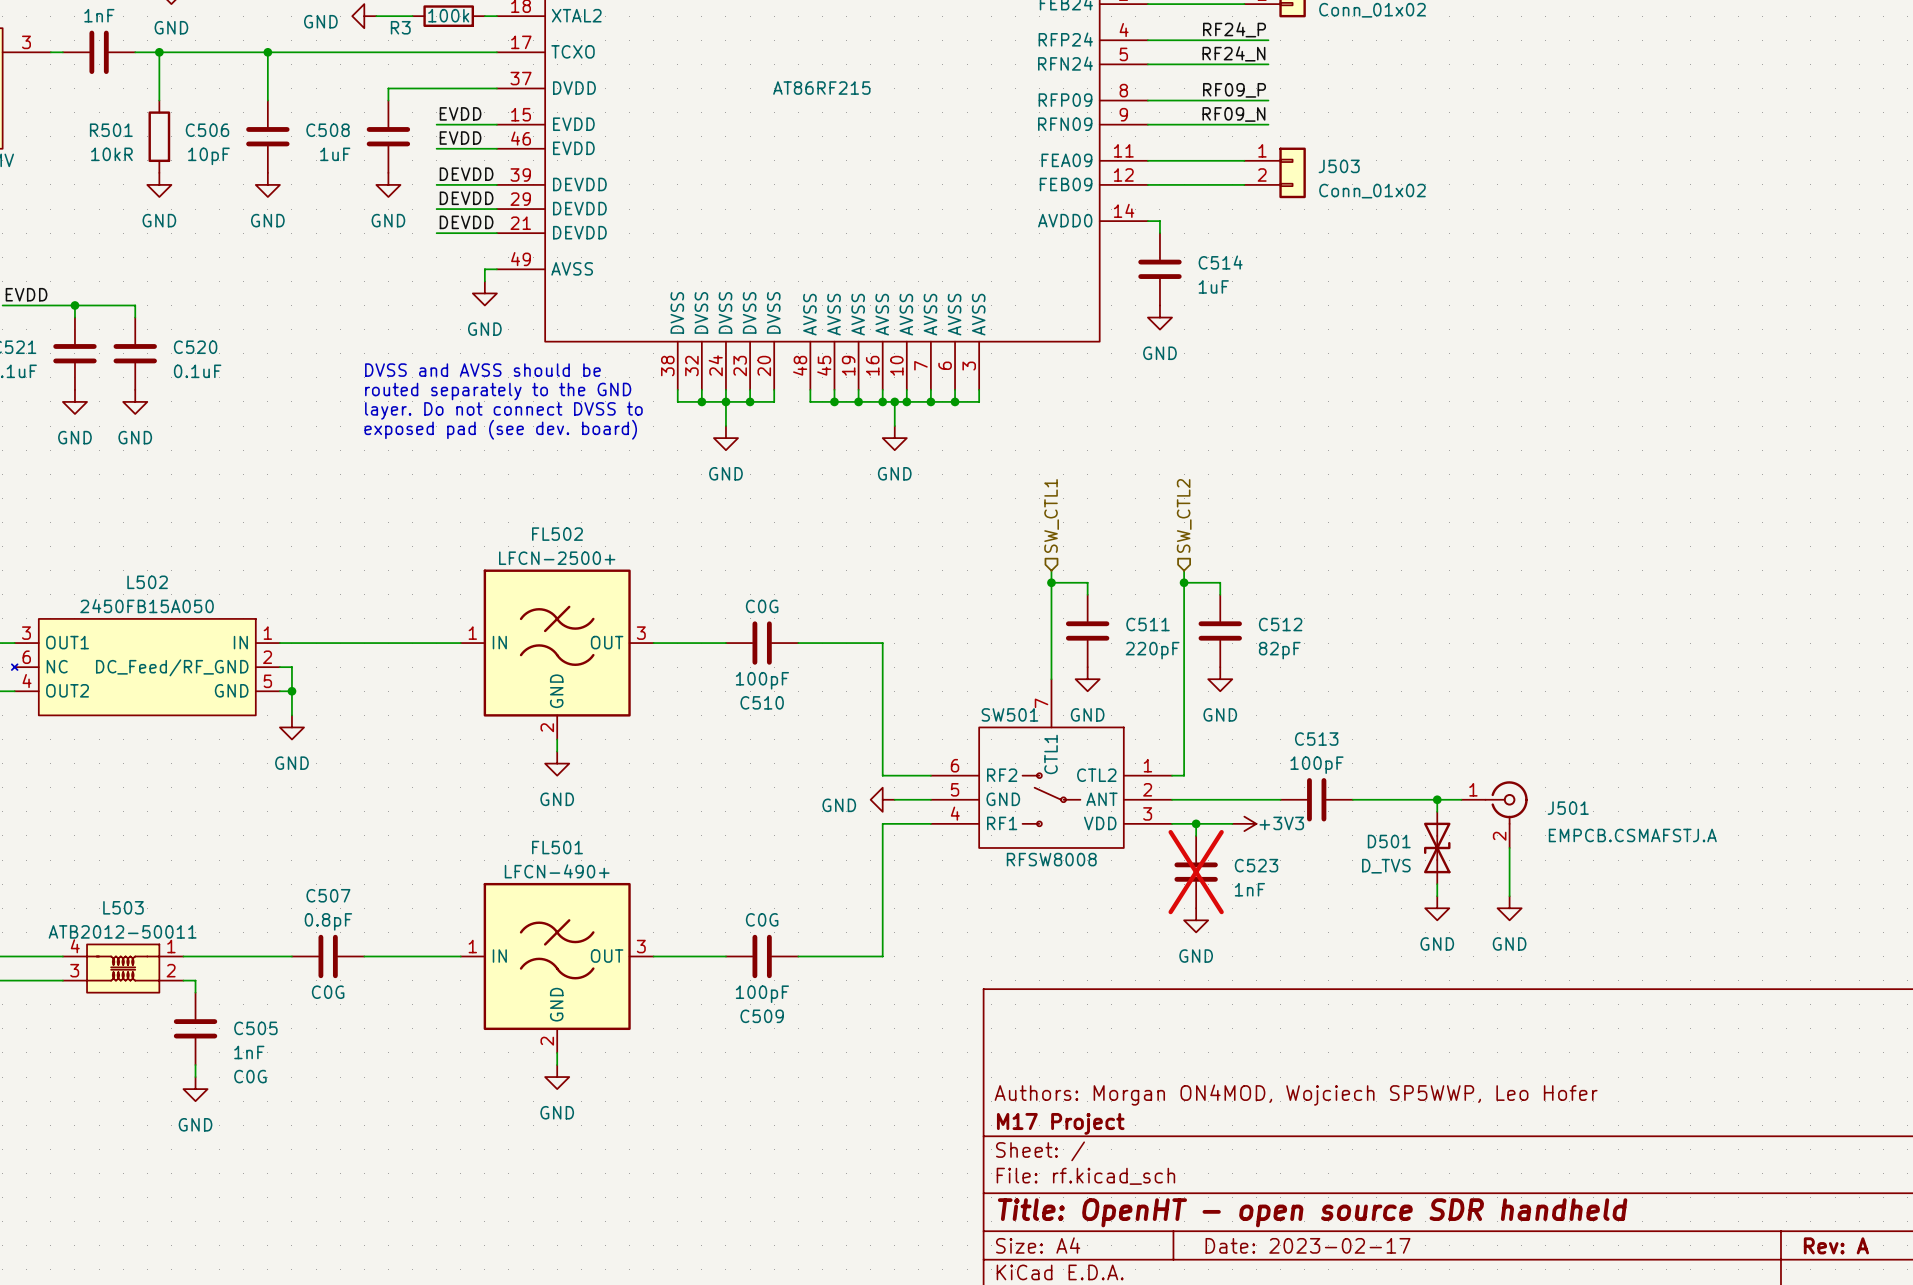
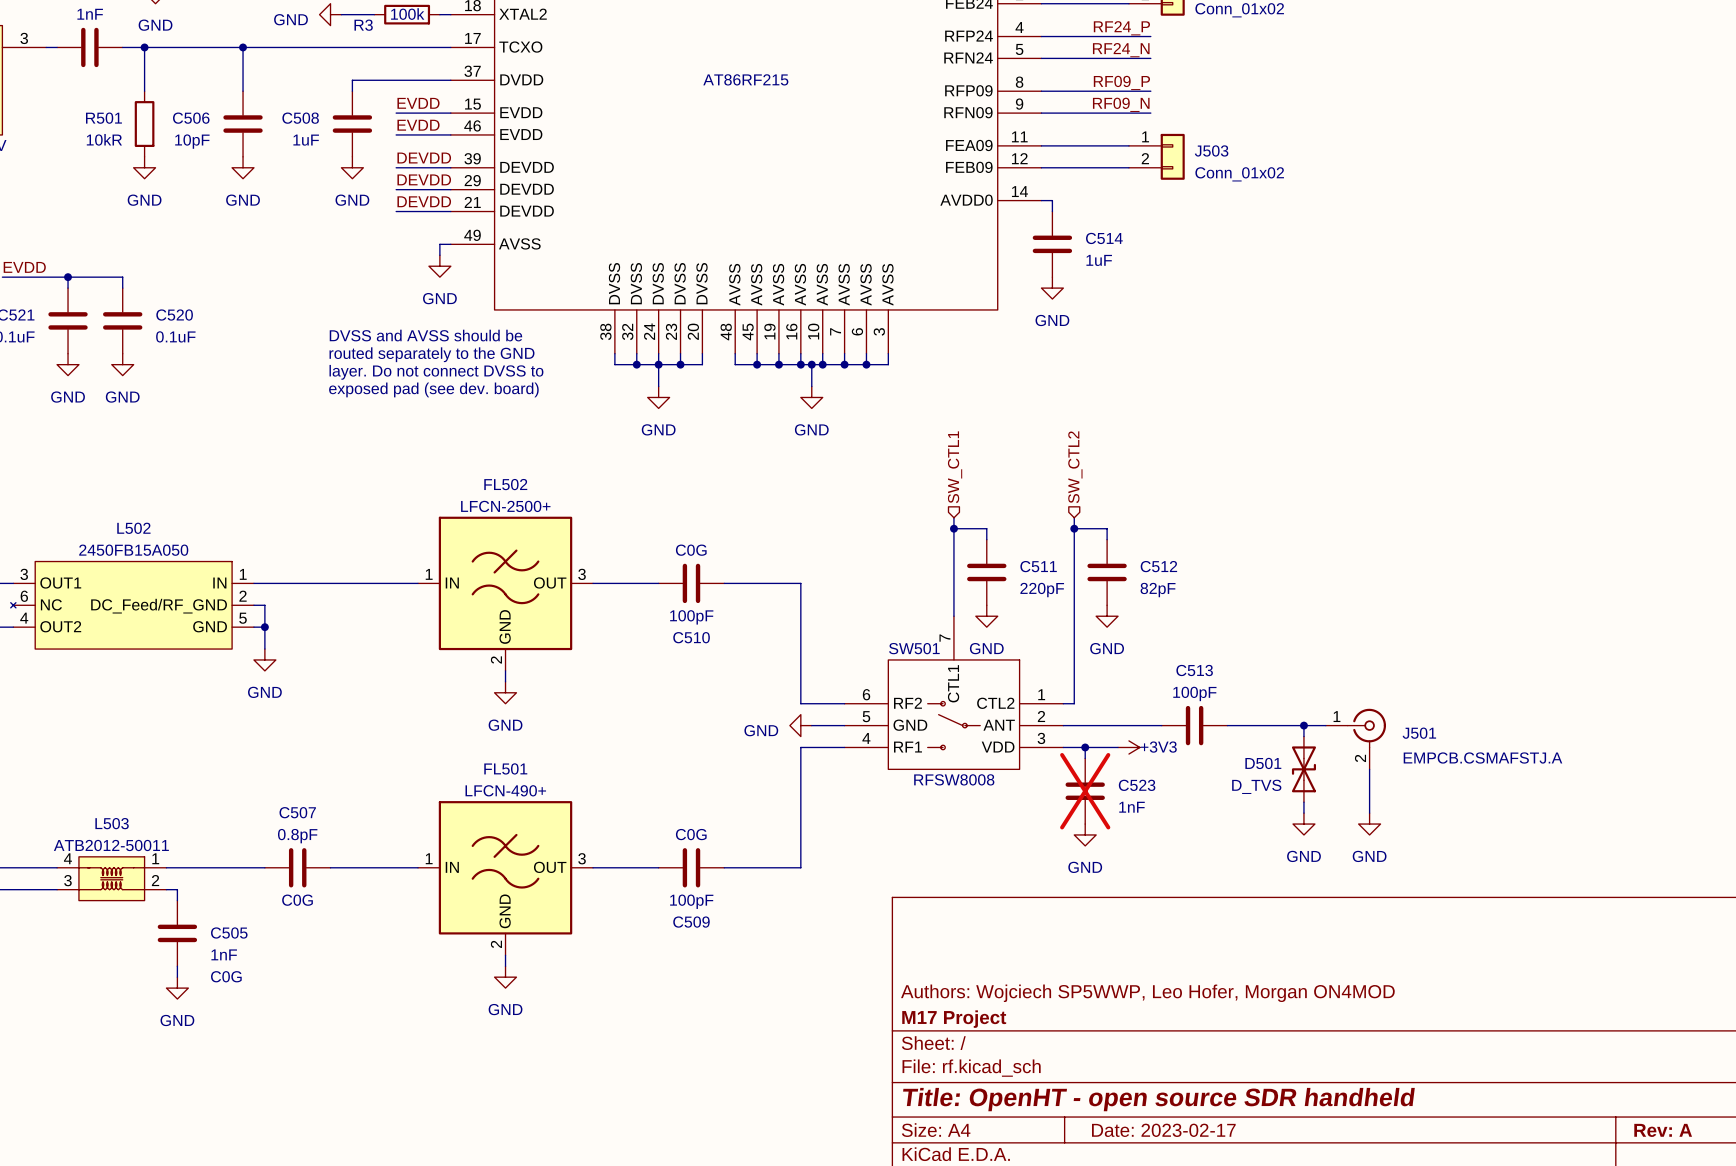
title block: Authors: Morgan ON4MOD, Wojciech SP5WWP, Leo Hofer (1296, 1095) -> Authors: Wojciech SP5WWP, Leo Hofer, Morgan ON4MOD (1147, 993)

